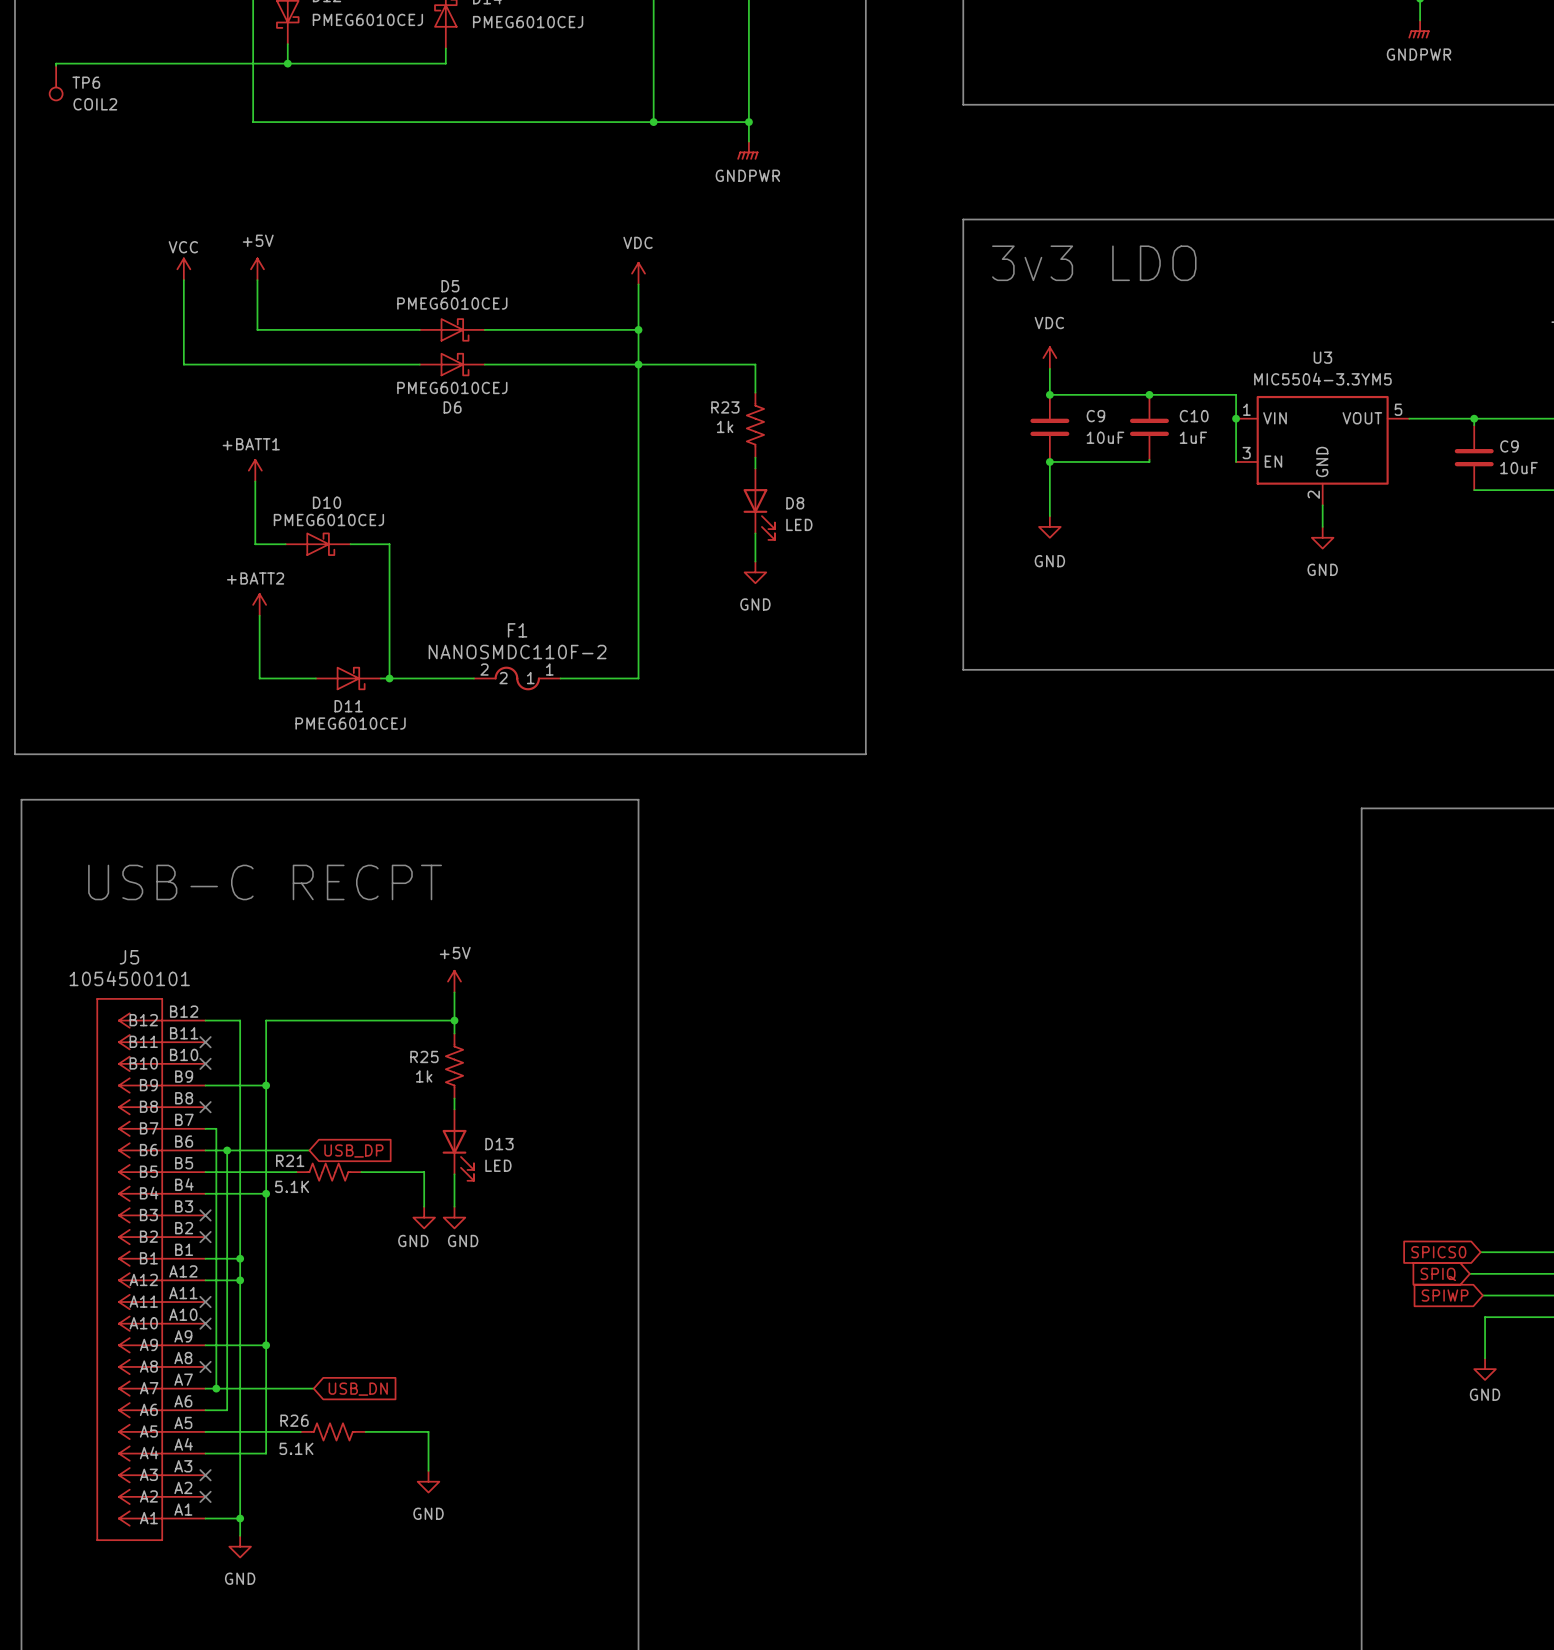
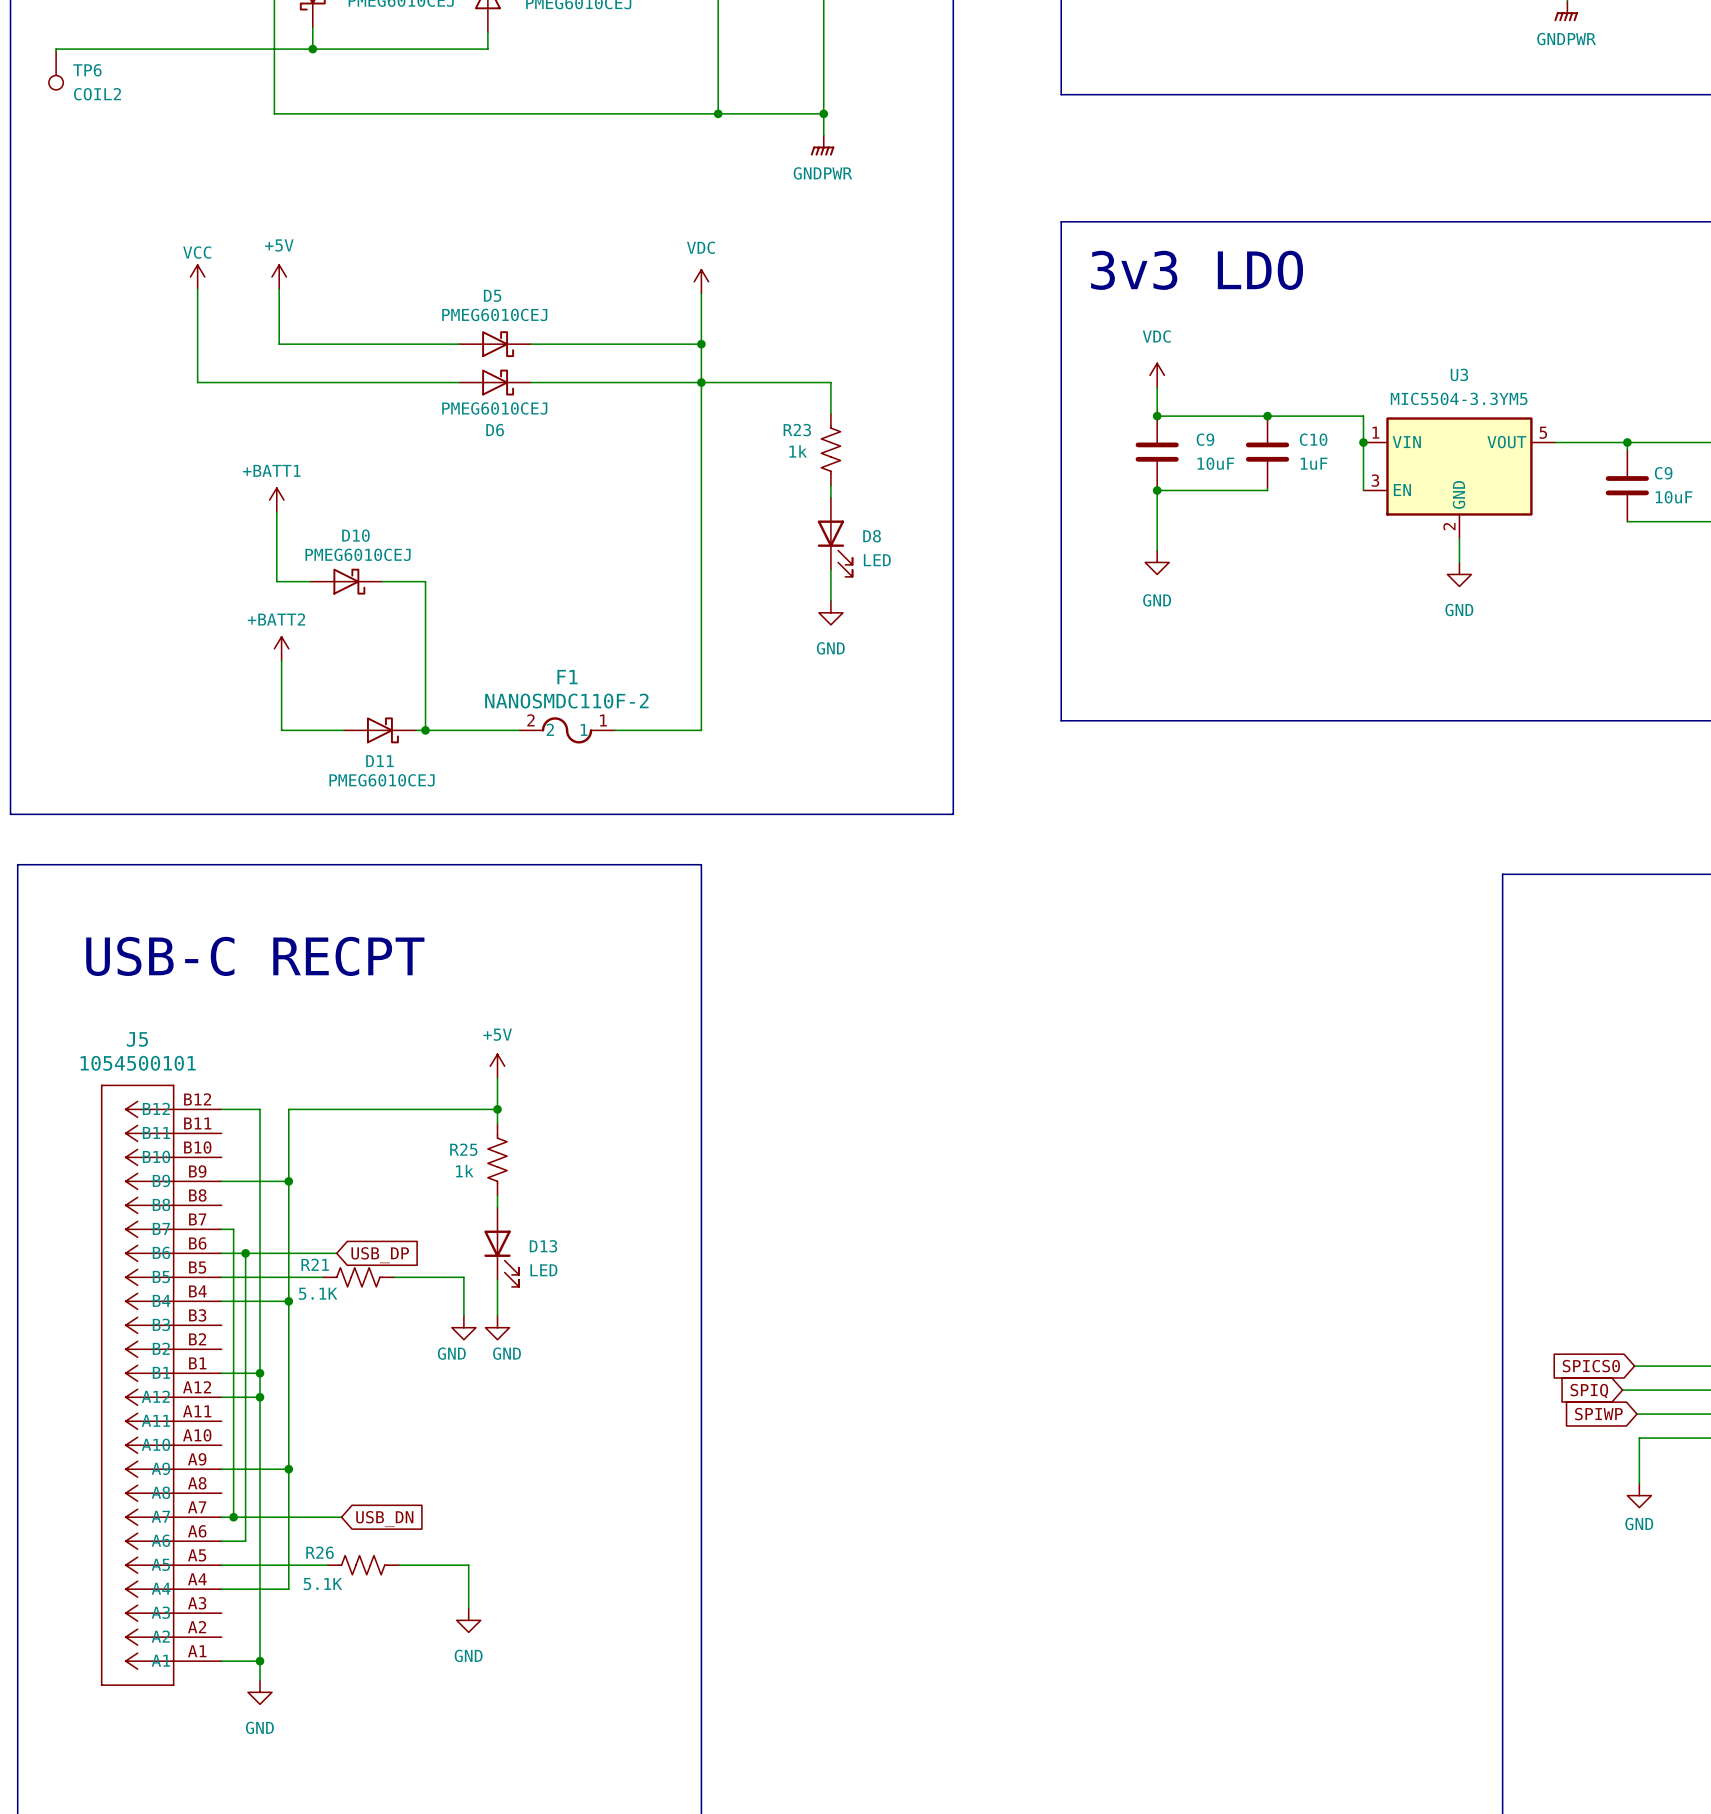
no-connect mark: (205, 1042) -> none
no-connect mark: (205, 1063) -> none
no-connect mark: (205, 1107) -> none
no-connect mark: (205, 1215) -> none
no-connect mark: (205, 1237) -> none
no-connect mark: (205, 1302) -> none
no-connect mark: (205, 1323) -> none
no-connect mark: (205, 1366) -> none
no-connect mark: (205, 1475) -> none
no-connect mark: (205, 1496) -> none

